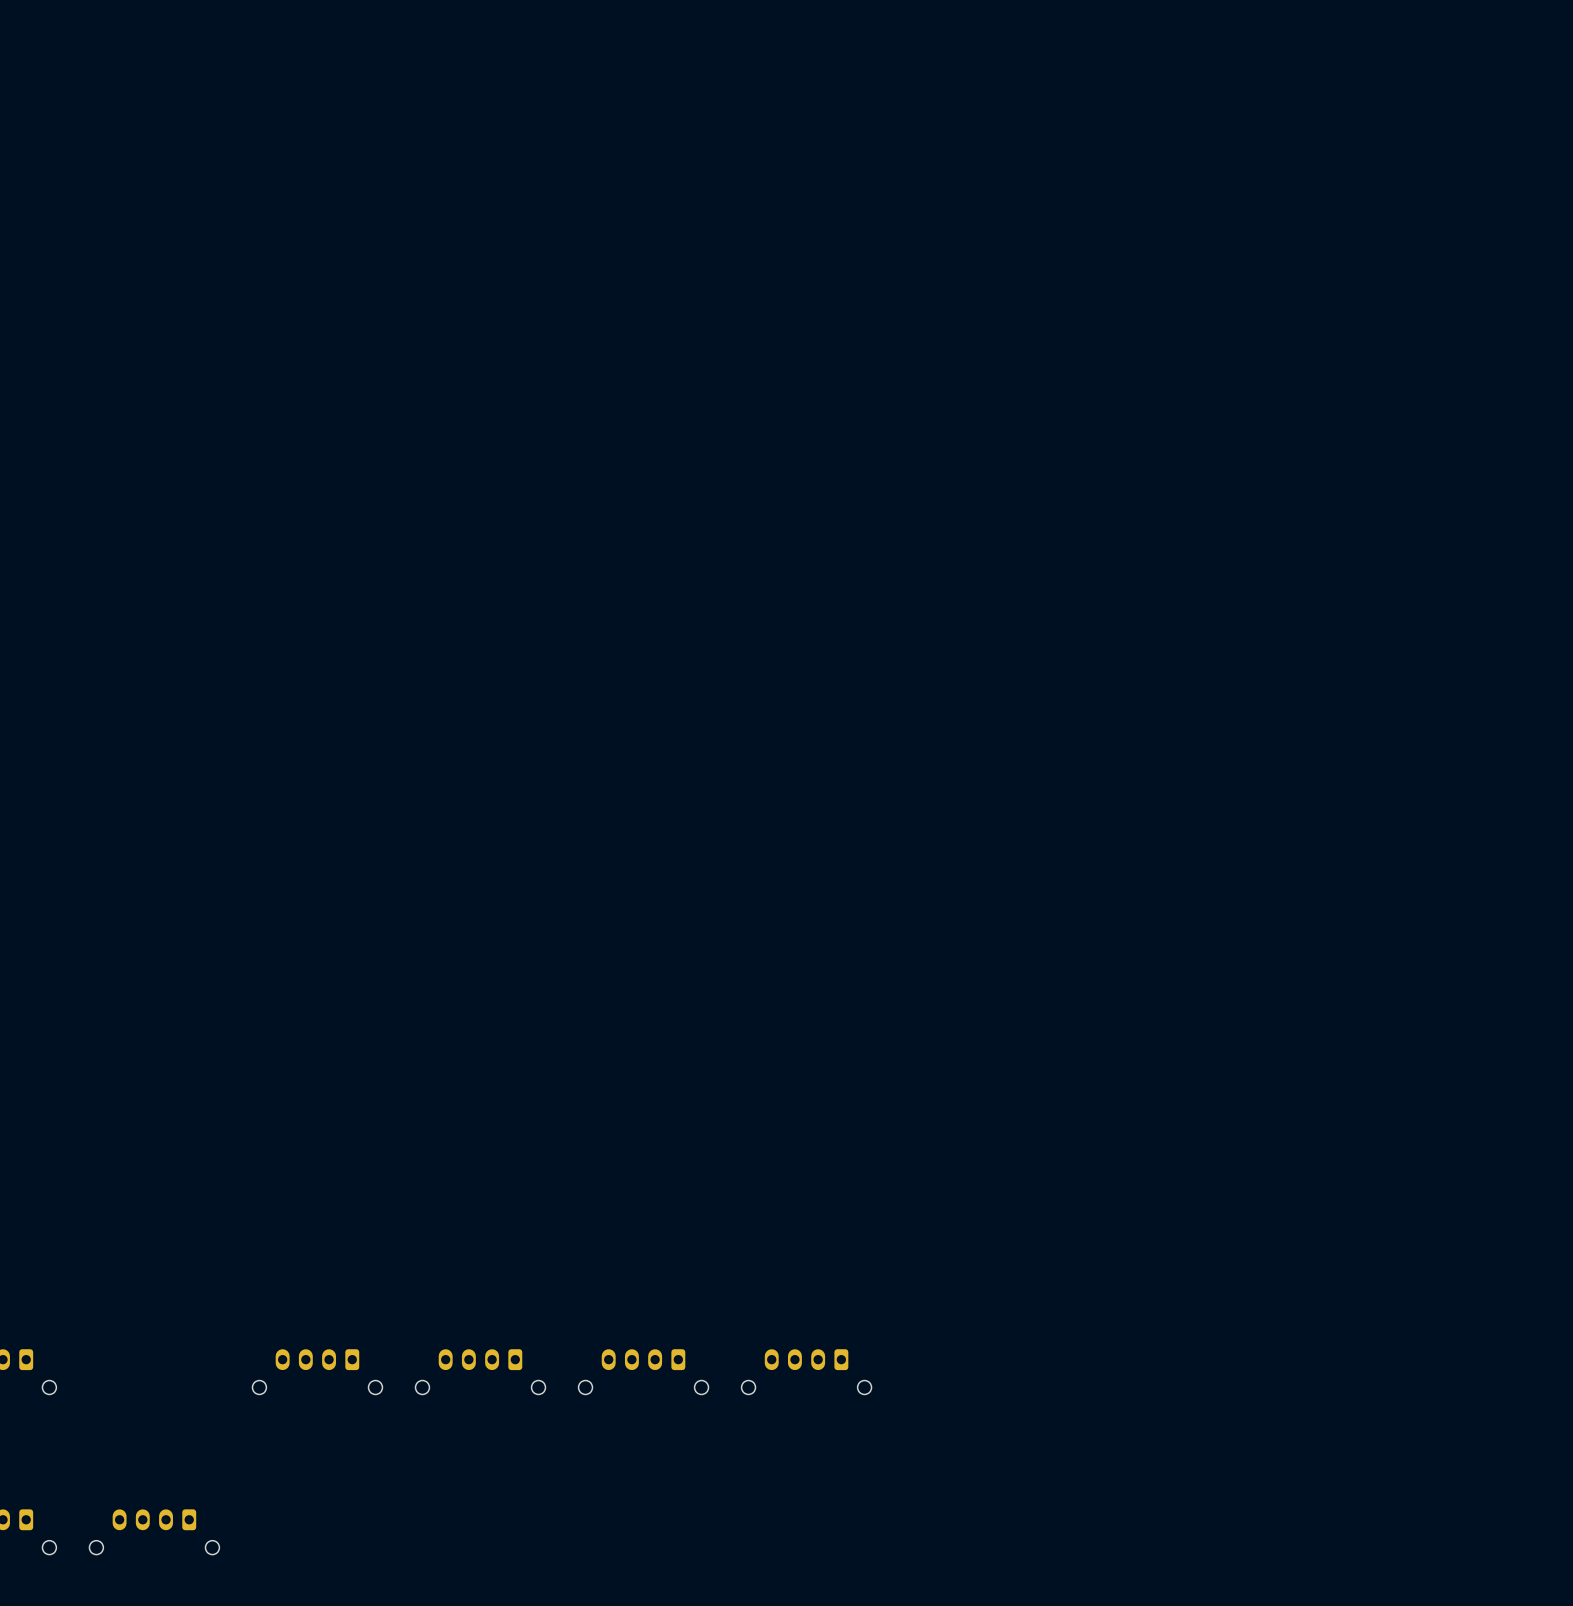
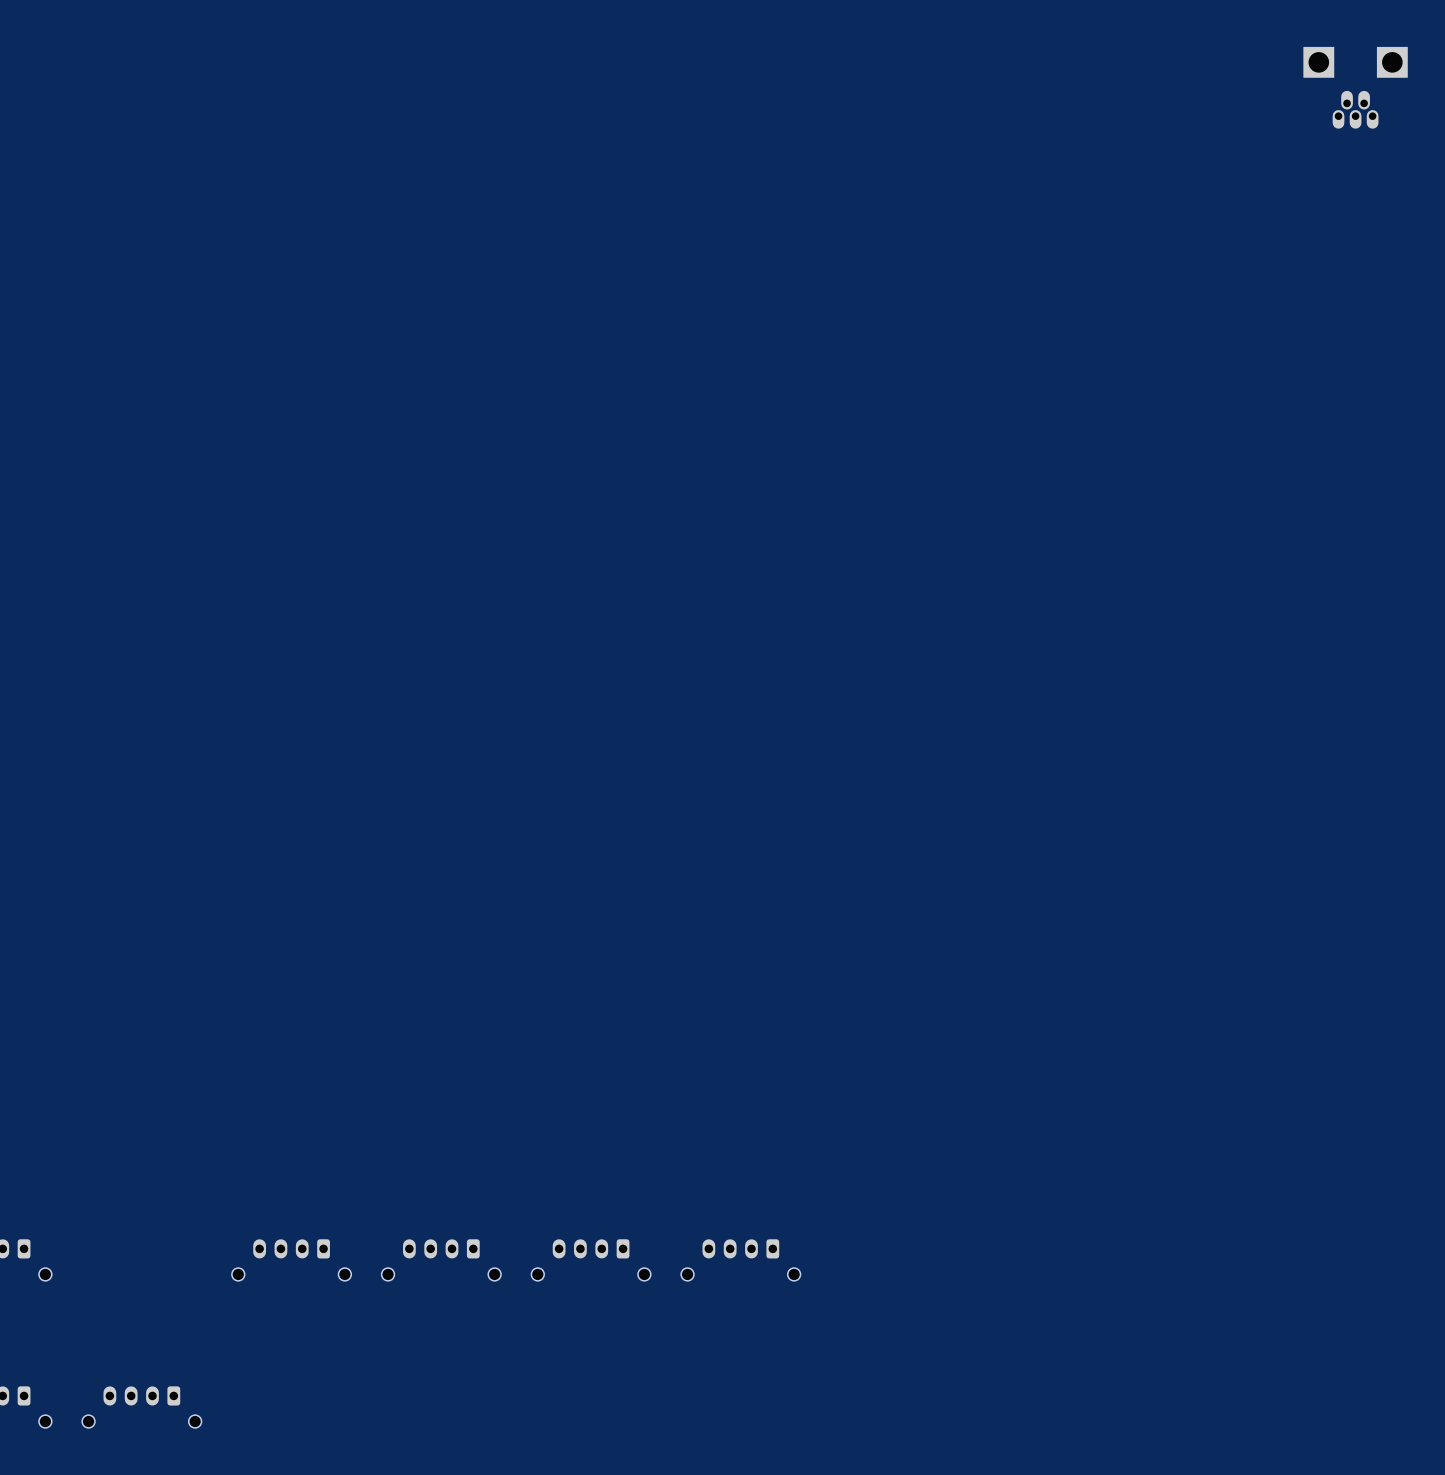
part: none -> (1355, 87)

